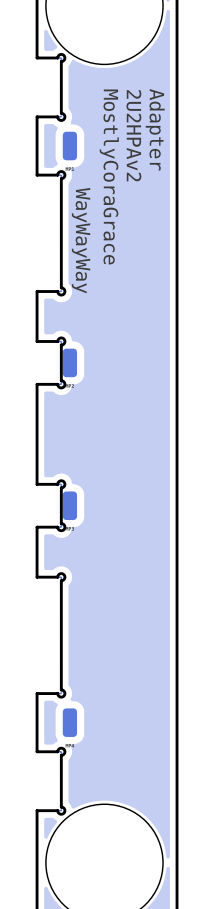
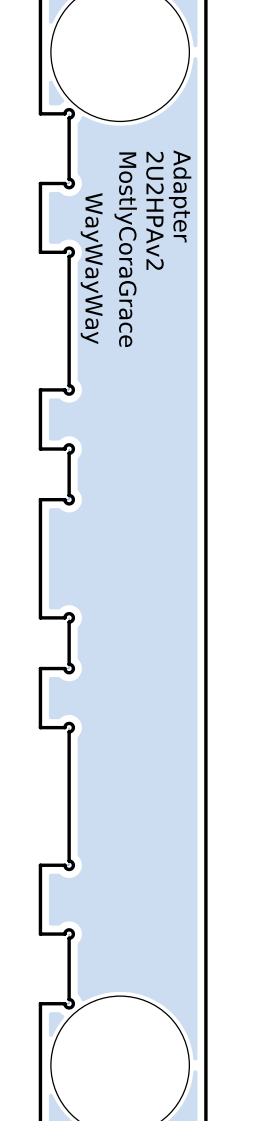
part: (69, 146) -> none
text position: WayWayWay (81, 240) -> WayWayWay (91, 268)
part: (69, 362) -> none
part: (69, 505) -> none
part: (69, 722) -> none

